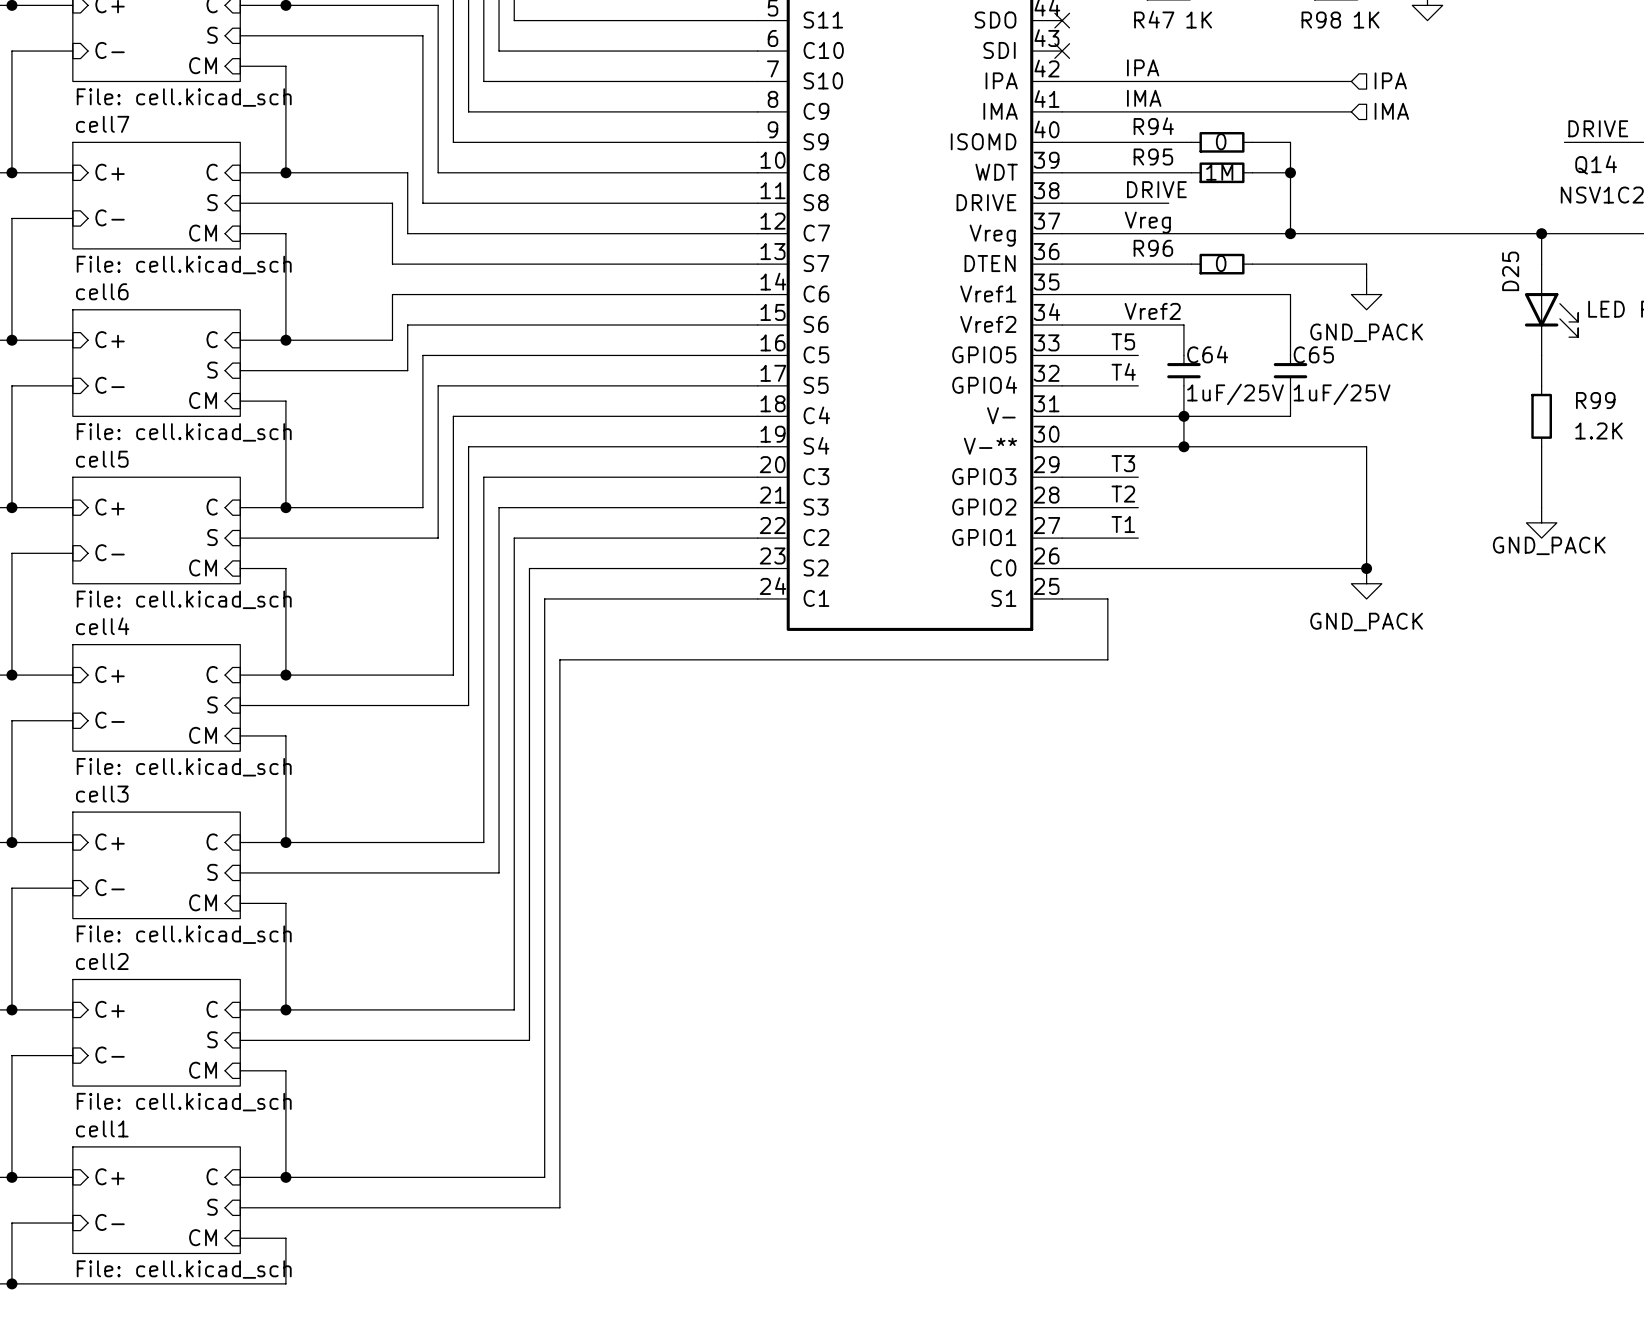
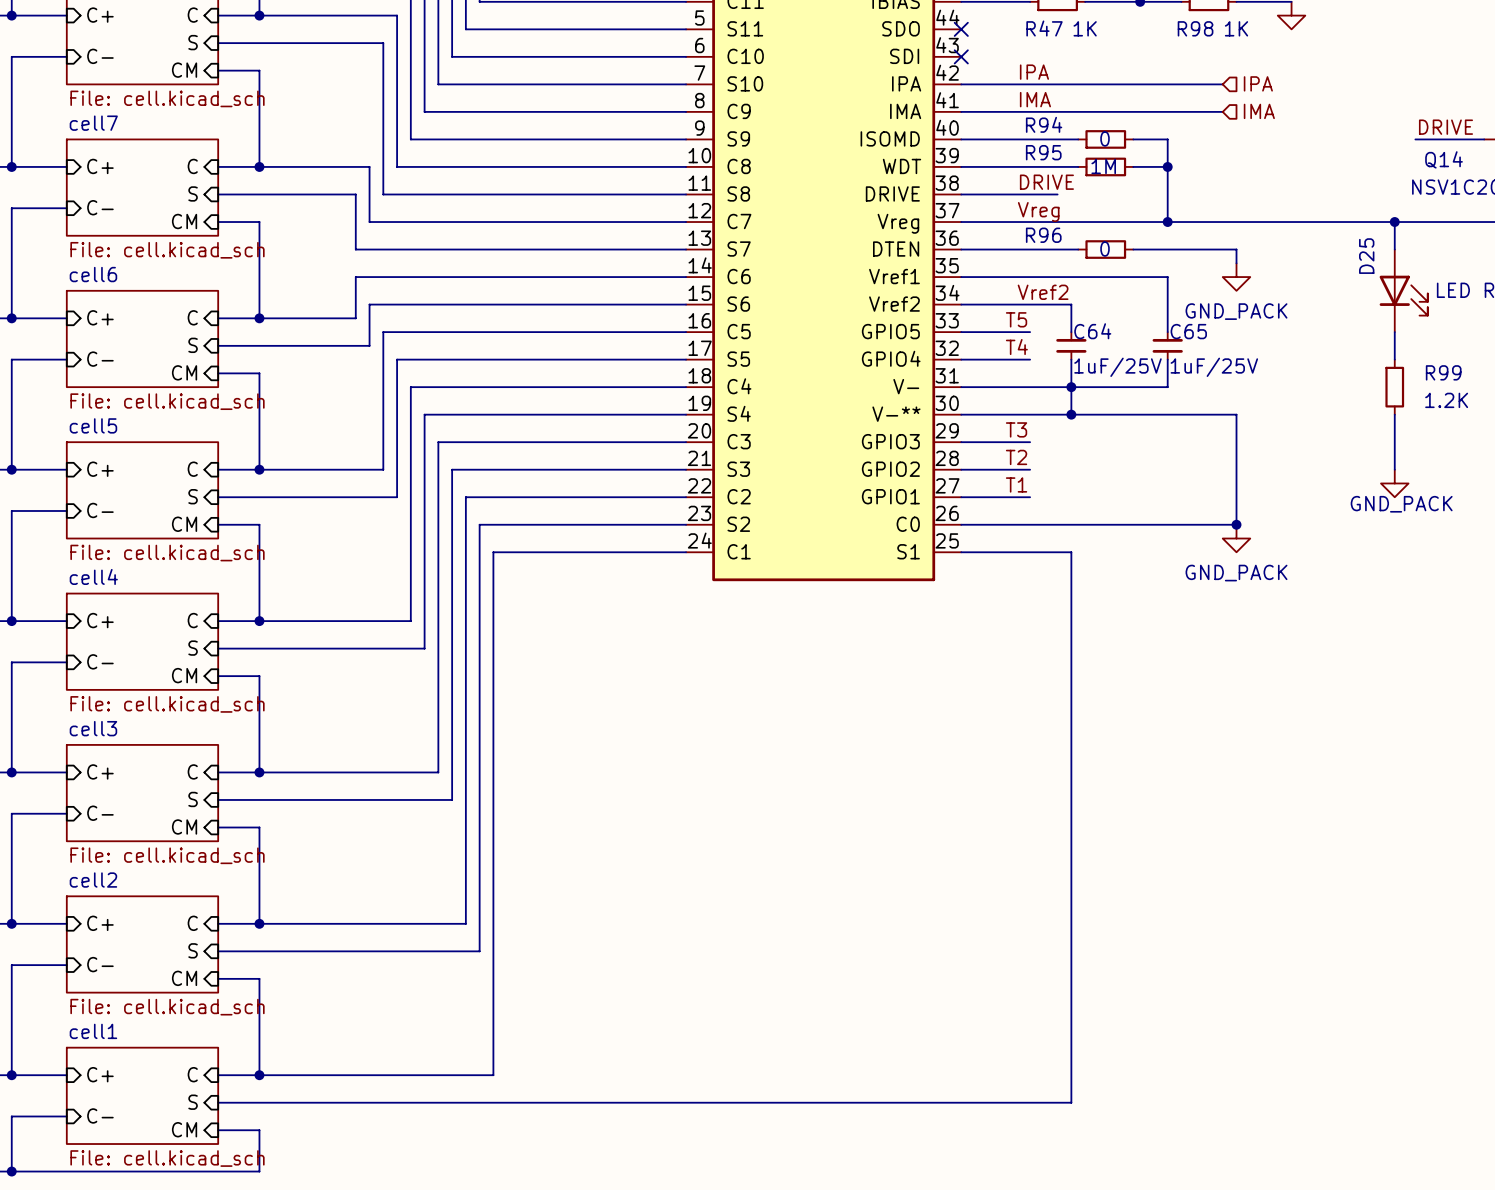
wire: (1107, 598) (1107, 659) (559, 659) (559, 1207) -> (1002, 552) (1071, 552) (1071, 1102) (507, 1102)

